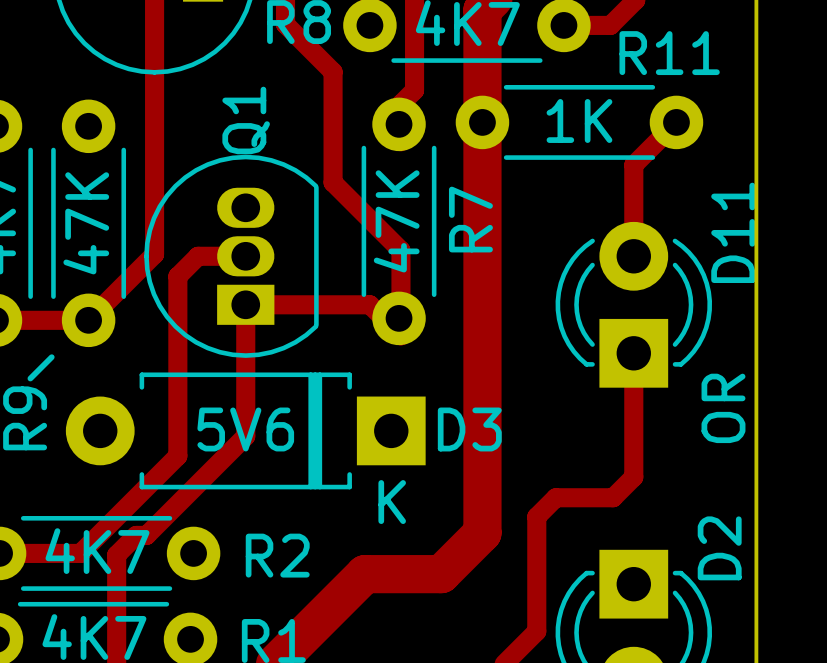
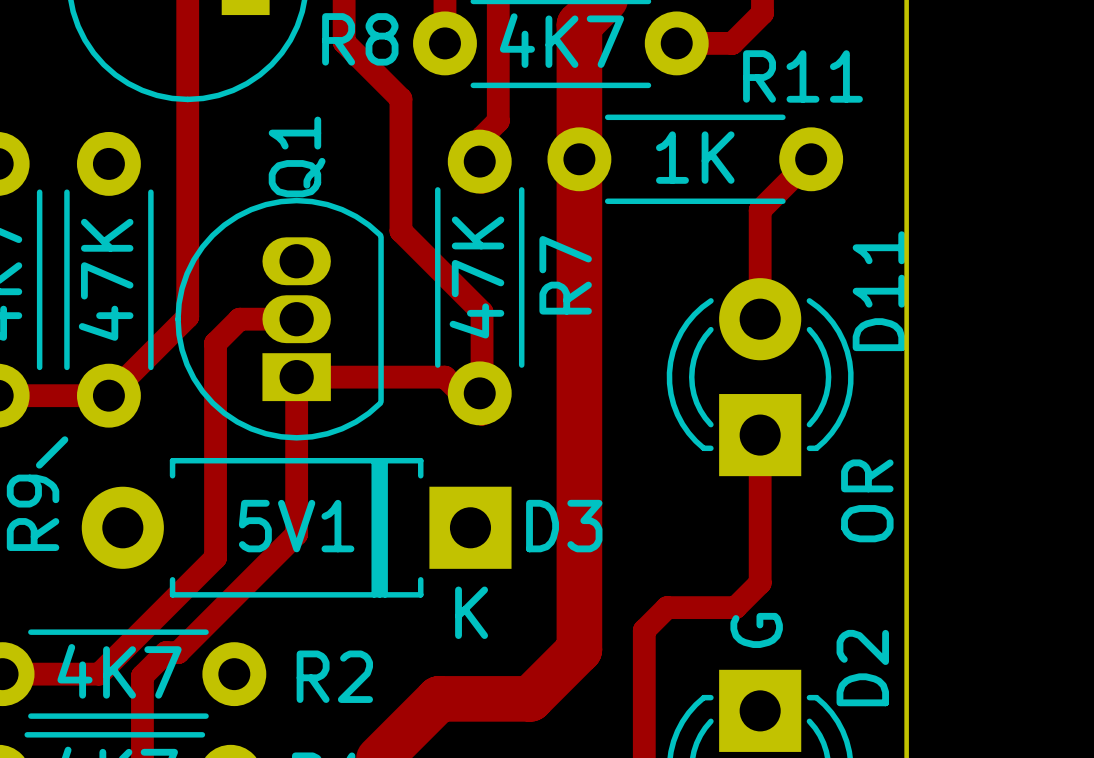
D3 value: 5V6 (245, 429) -> 5V1 (296, 526)
D2 value: none -> G (756, 630)

